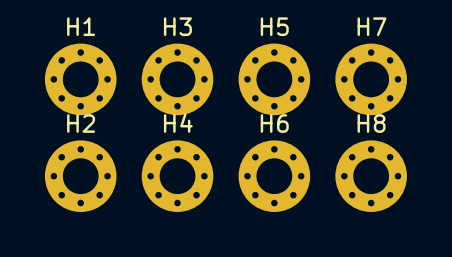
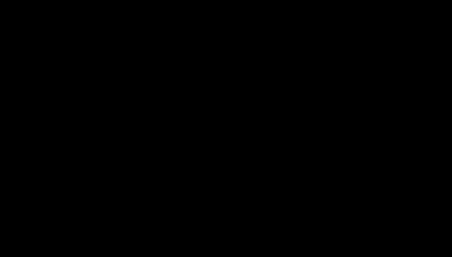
H1: (80, 79) -> none
H3: (177, 79) -> none
H5: (274, 79) -> none
H7: (371, 79) -> none
H2: (80, 176) -> none
H4: (177, 176) -> none
H6: (274, 176) -> none
H8: (371, 176) -> none

